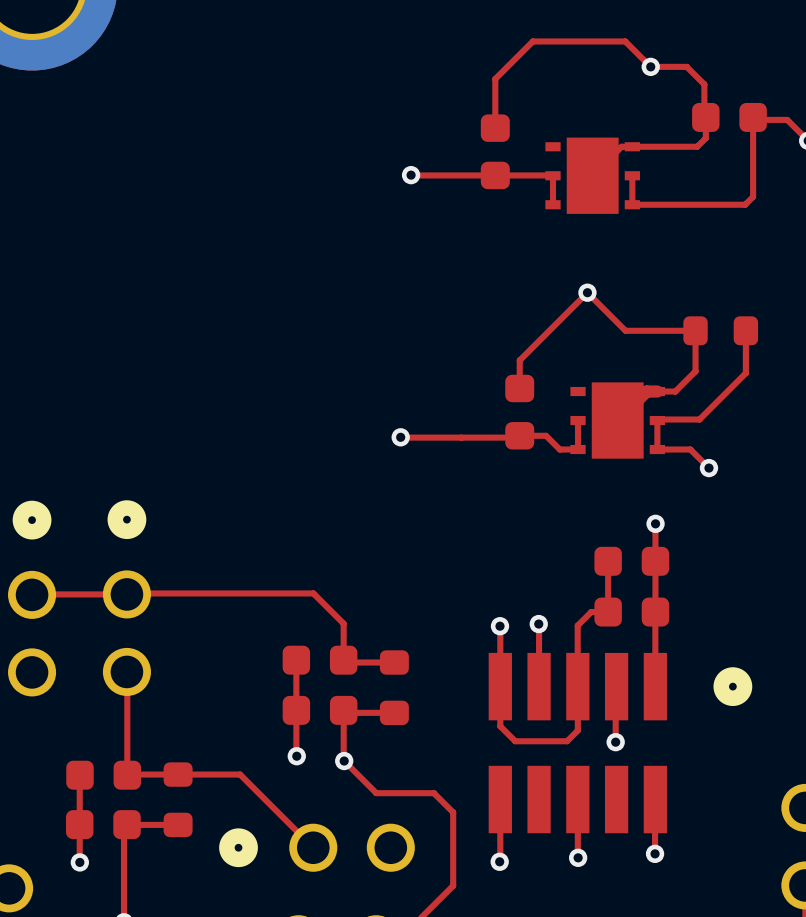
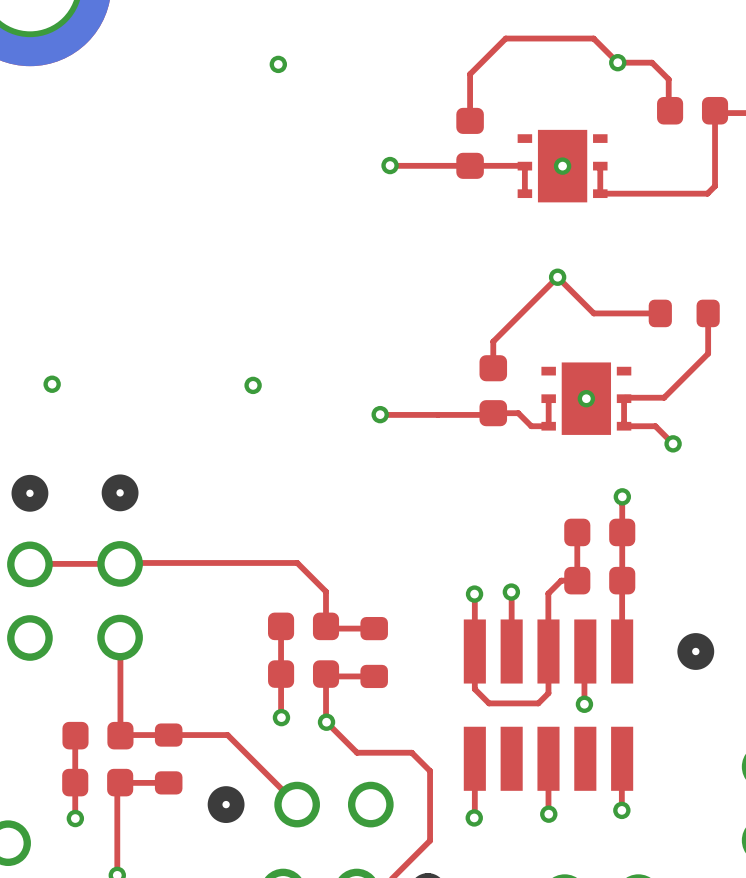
via: none -> (278, 64)
top track: (705, 117) (705, 138) (697, 146) (621, 146) (592, 175) -> none
part footprint: [545, 137, 640, 214] -> [517, 129, 608, 203]
top track: (695, 330) (695, 371) (675, 391) (646, 391) (617, 420) -> none
part footprint: [570, 382, 666, 459] -> [541, 362, 632, 435]
via: none -> (52, 384)
via: none -> (253, 385)

